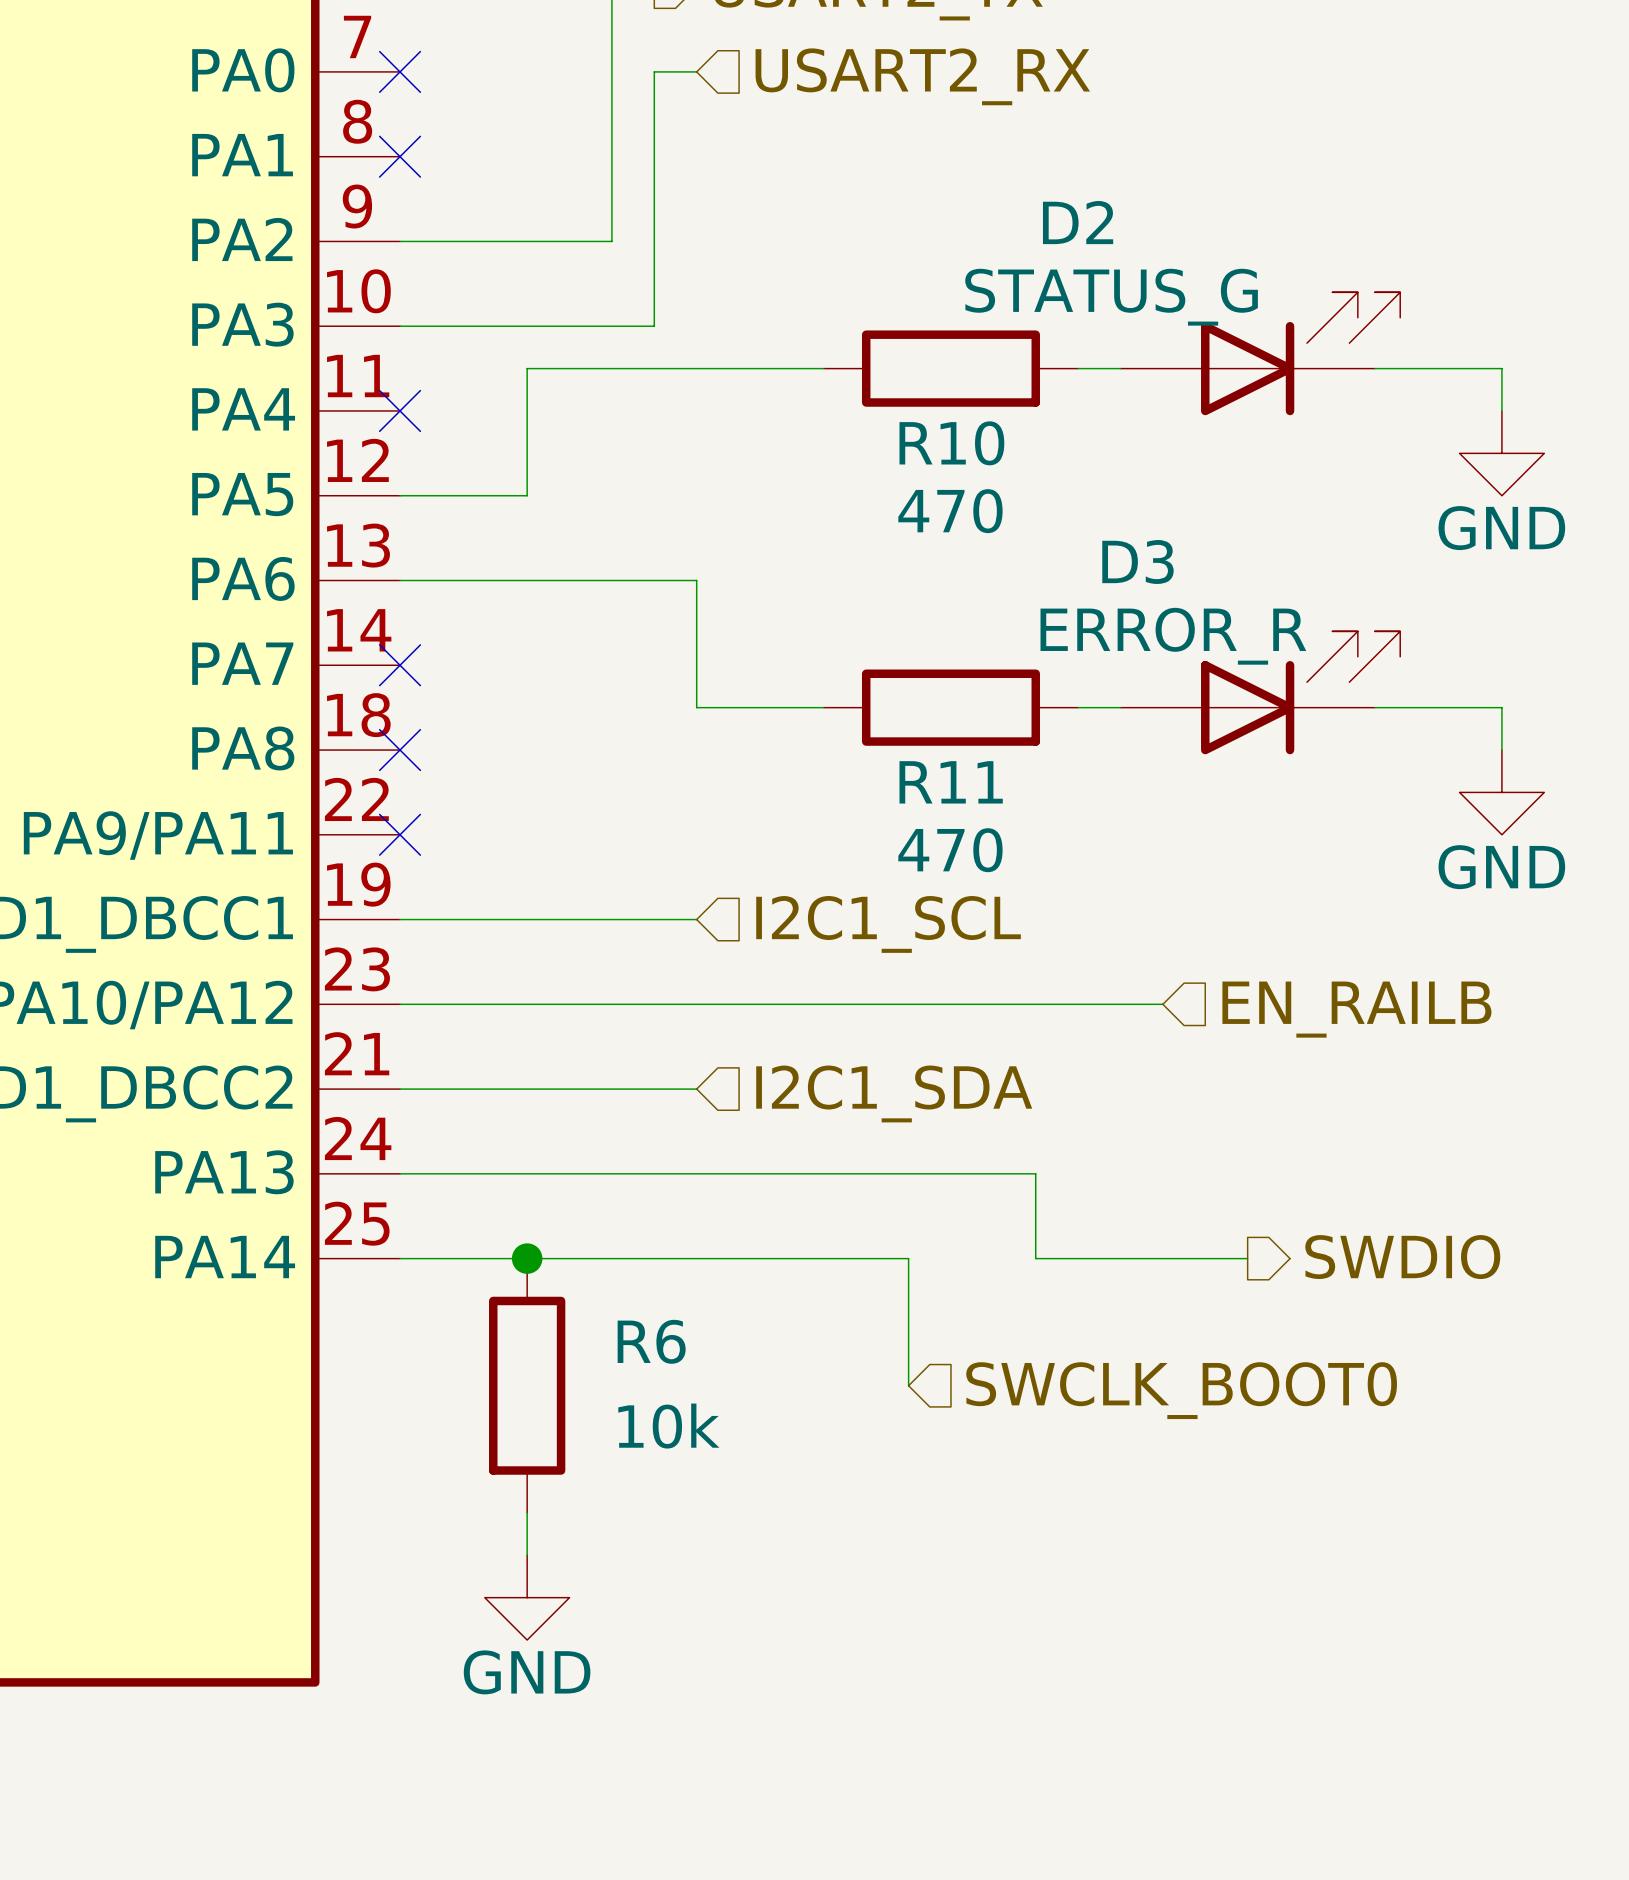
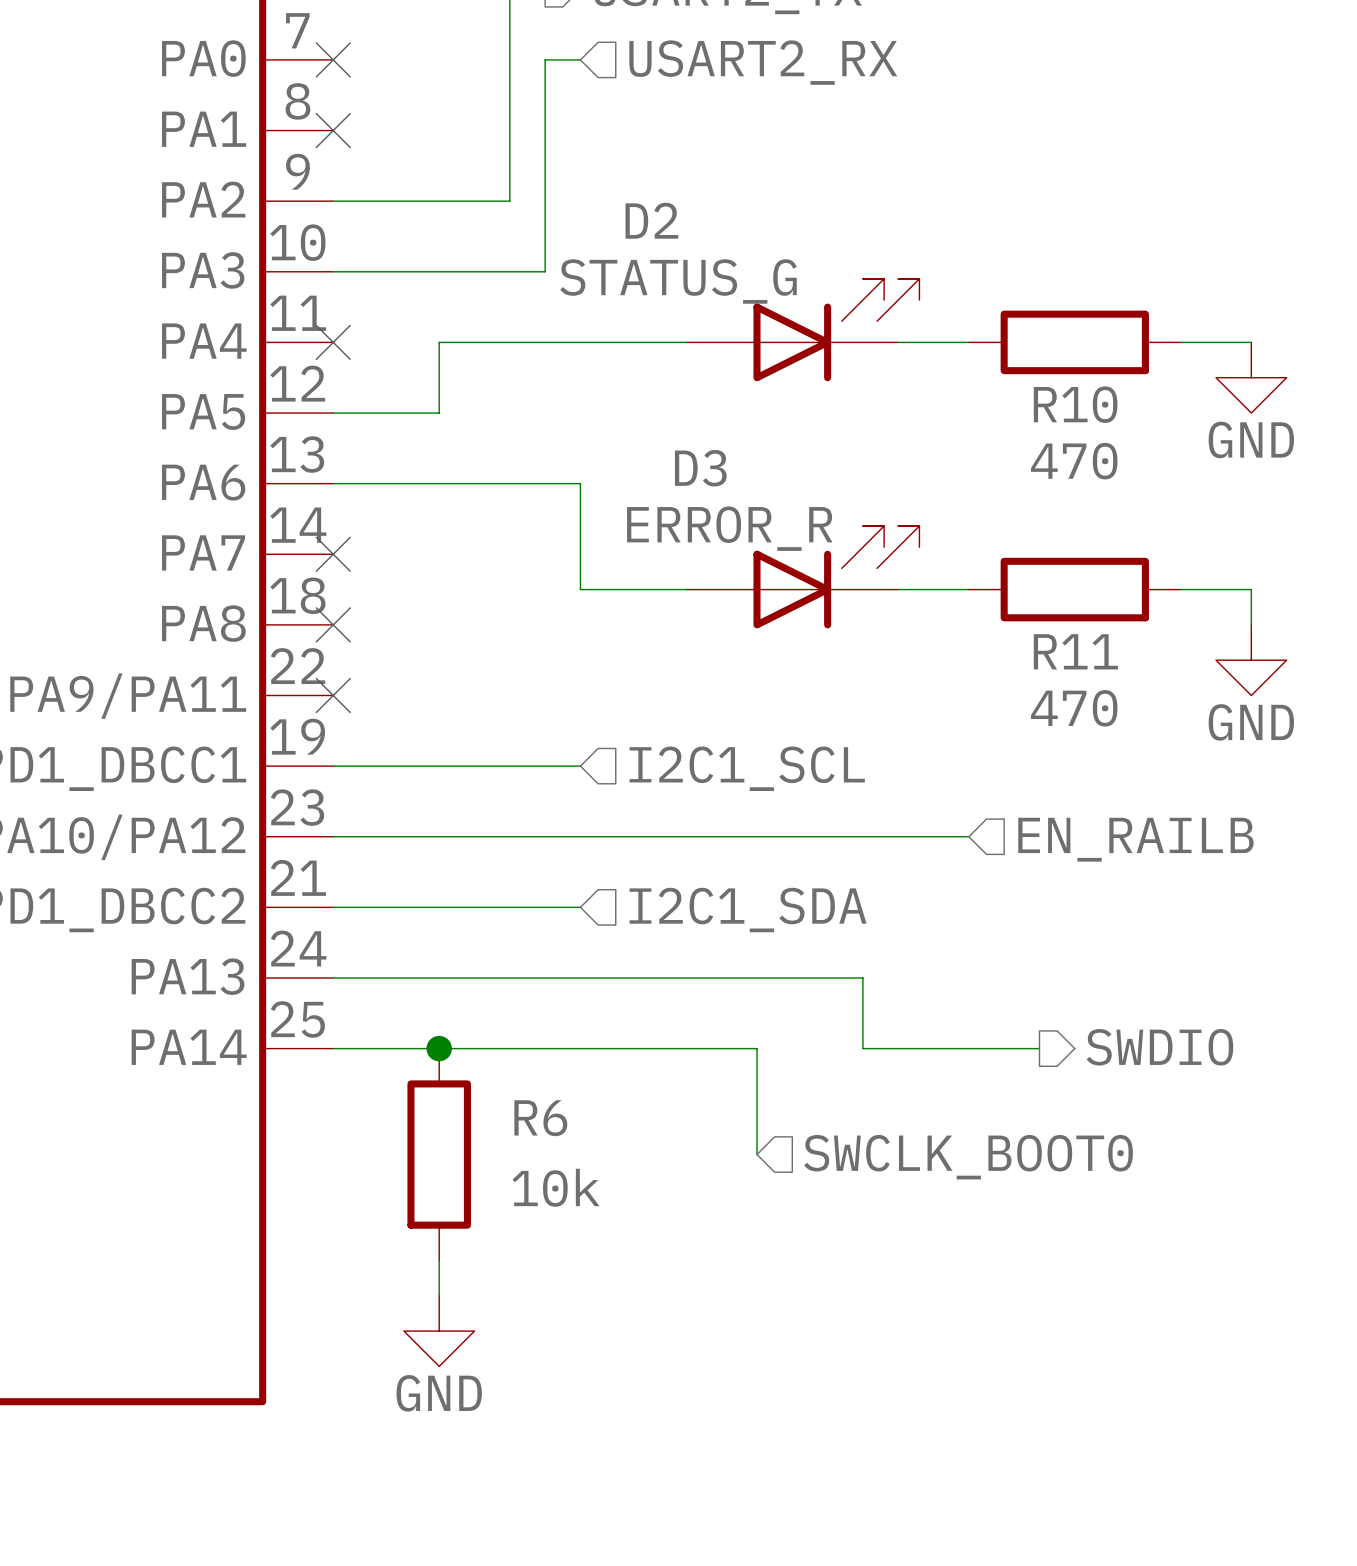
D2 position: (1260, 353) -> (802, 330)
wire: (823, 368) (527, 368) (527, 410) -> (686, 342) (439, 342)
R10 position: (950, 368) -> (1074, 342)
wire: (1078, 368) (1120, 368) -> none
wire: (1374, 368) (1501, 368) (1501, 410) -> (1180, 342) (1251, 342)
wire: none -> (898, 342) (968, 342)
D3 position: (1260, 692) -> (802, 577)
R11 position: (950, 707) -> (1074, 589)

